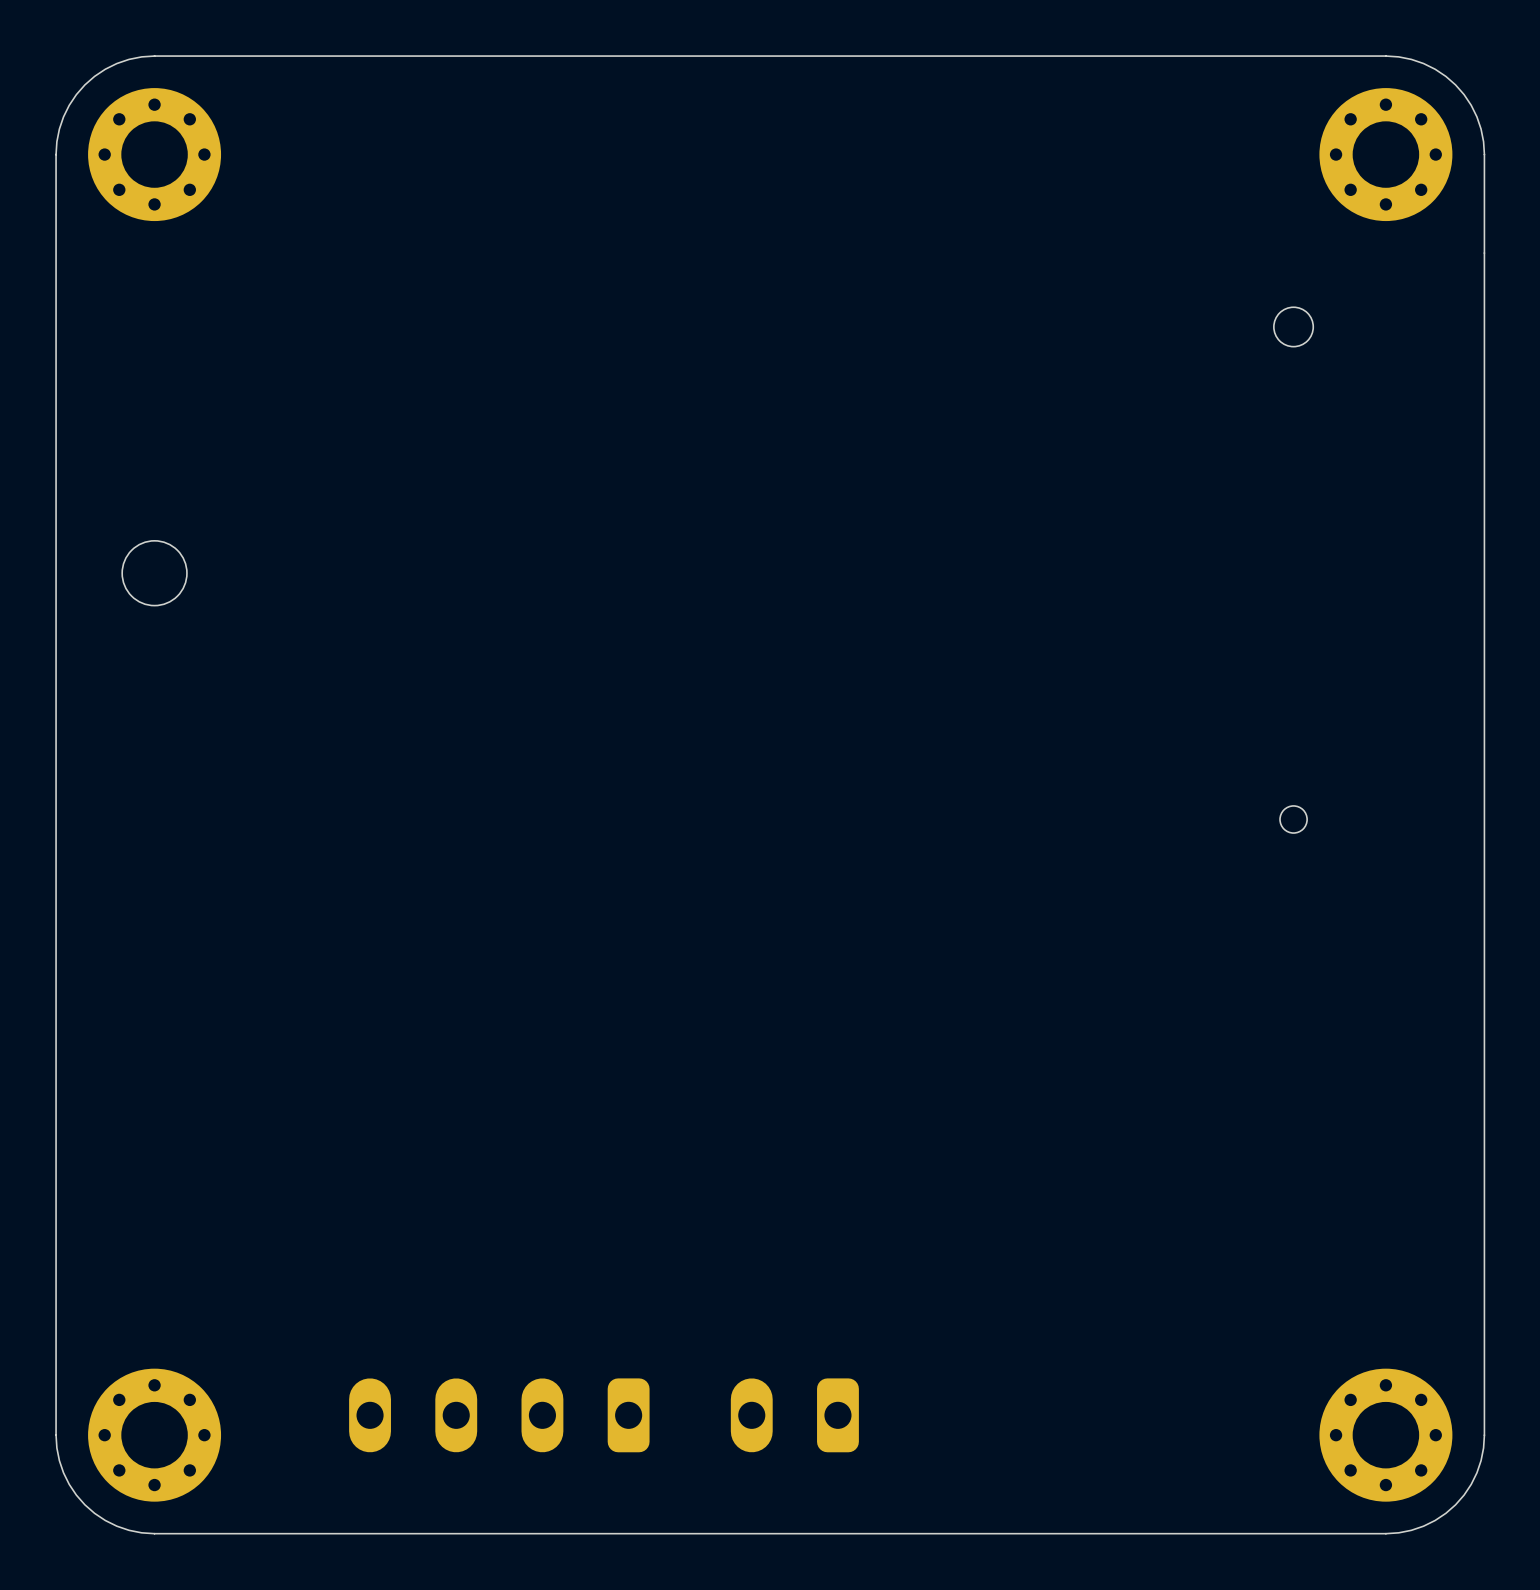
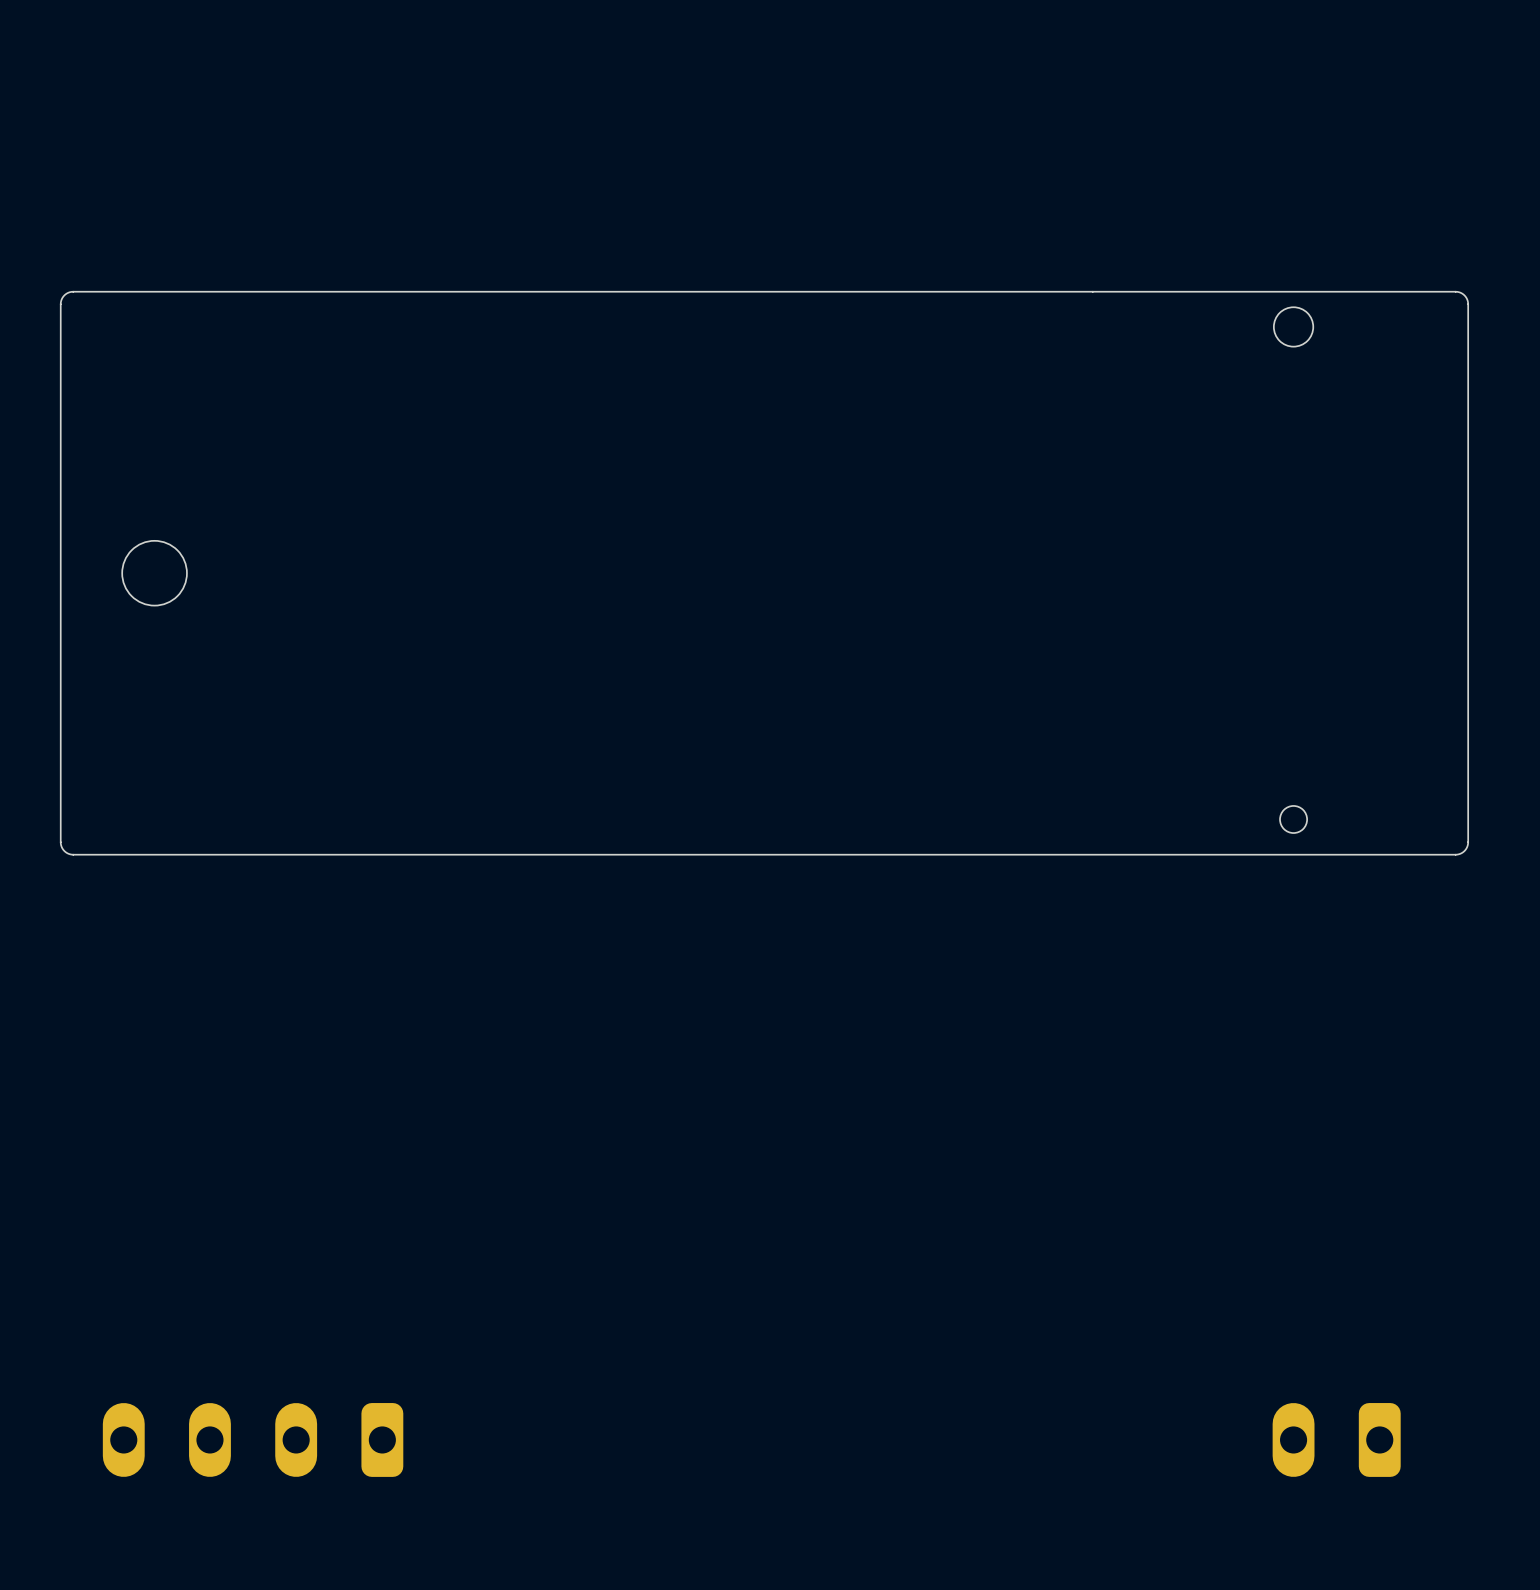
board edge: (1385, 56) (154, 56) (129, 59) (116, 63) (94, 76) (84, 84) (76, 94) (63, 116) (59, 129) (56, 154) (56, 1435) (59, 1460) (63, 1472) (76, 1495) (84, 1504) (105, 1520) (116, 1526) (129, 1530) (154, 1533) (1385, 1533) (1411, 1530) (1423, 1526) (1435, 1520) (1455, 1504) (1464, 1495) (1476, 1472) (1483, 1448) (1484, 1435) (1484, 154) (1483, 141) (1476, 116) (1471, 105) (1455, 84) (1445, 76) (1423, 63) (1411, 59) (1385, 56) -> none
part: (154, 154) -> none
part: (1385, 154) -> none
board edge: none -> (1455, 291) (68, 292) (62, 297) (60, 304) (61, 846) (65, 852) (73, 854) (1460, 853) (1466, 848) (1468, 842) (1468, 304) (1464, 295) (1455, 291)
part position: (499, 1415) -> (253, 1439)
part position: (794, 1415) -> (1336, 1439)
part: (154, 1435) -> none
part: (1385, 1435) -> none

